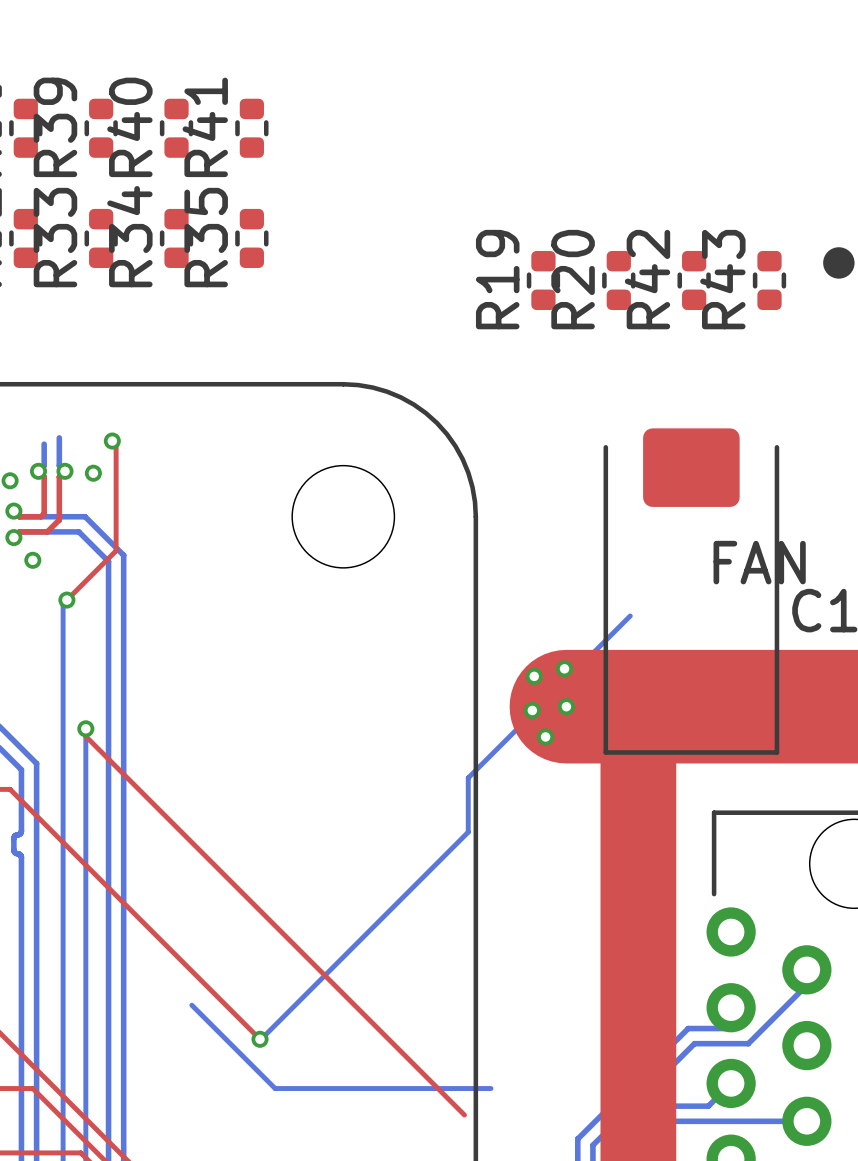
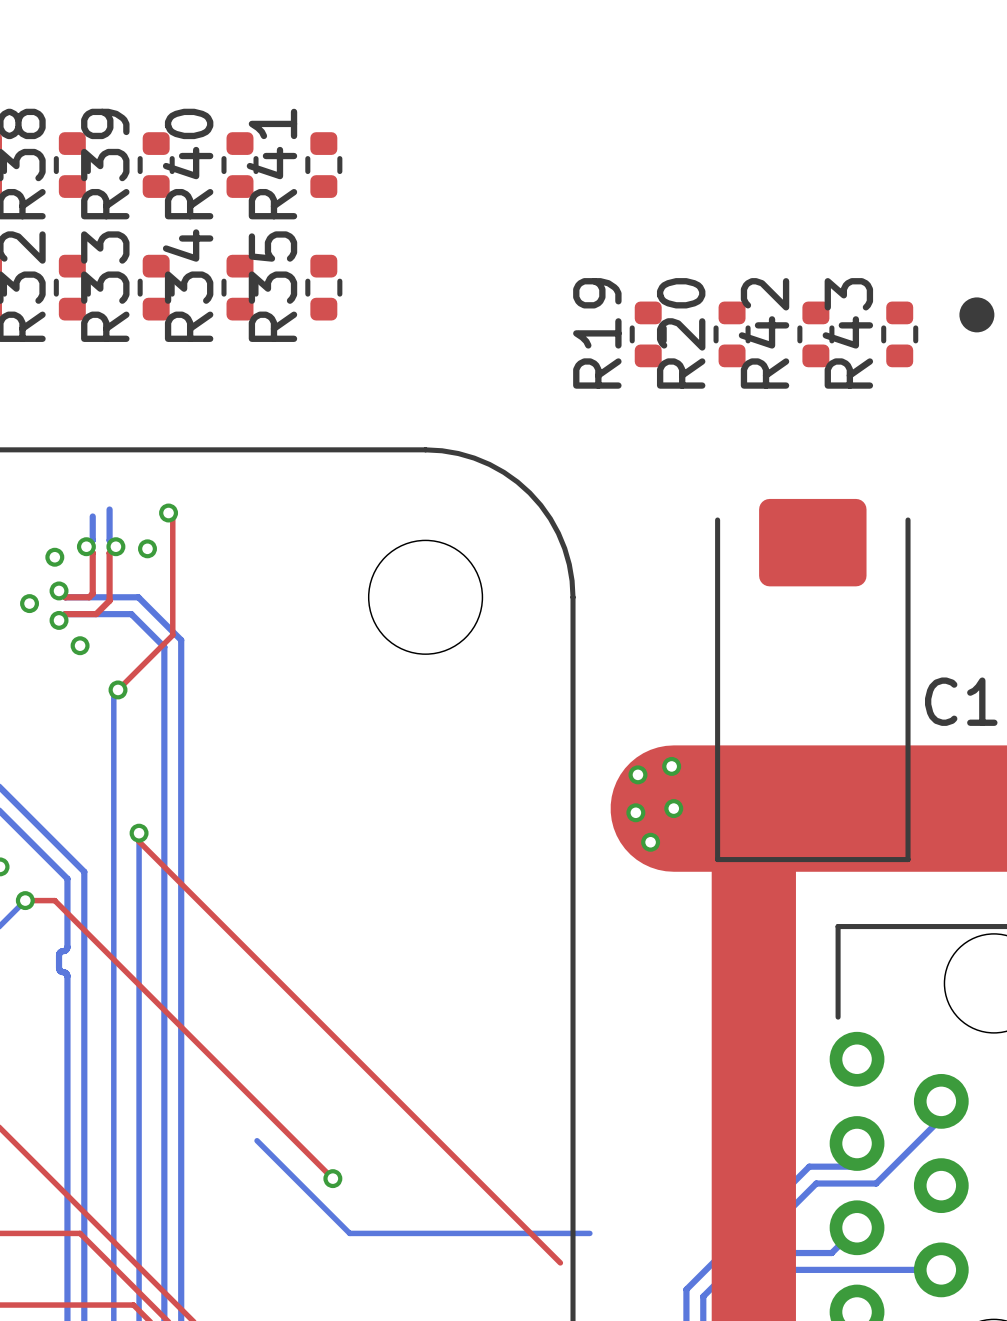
text: FAN (759, 562) -> none
bottom track: (630, 615) (468, 777) (468, 832) (261, 1039) -> none

